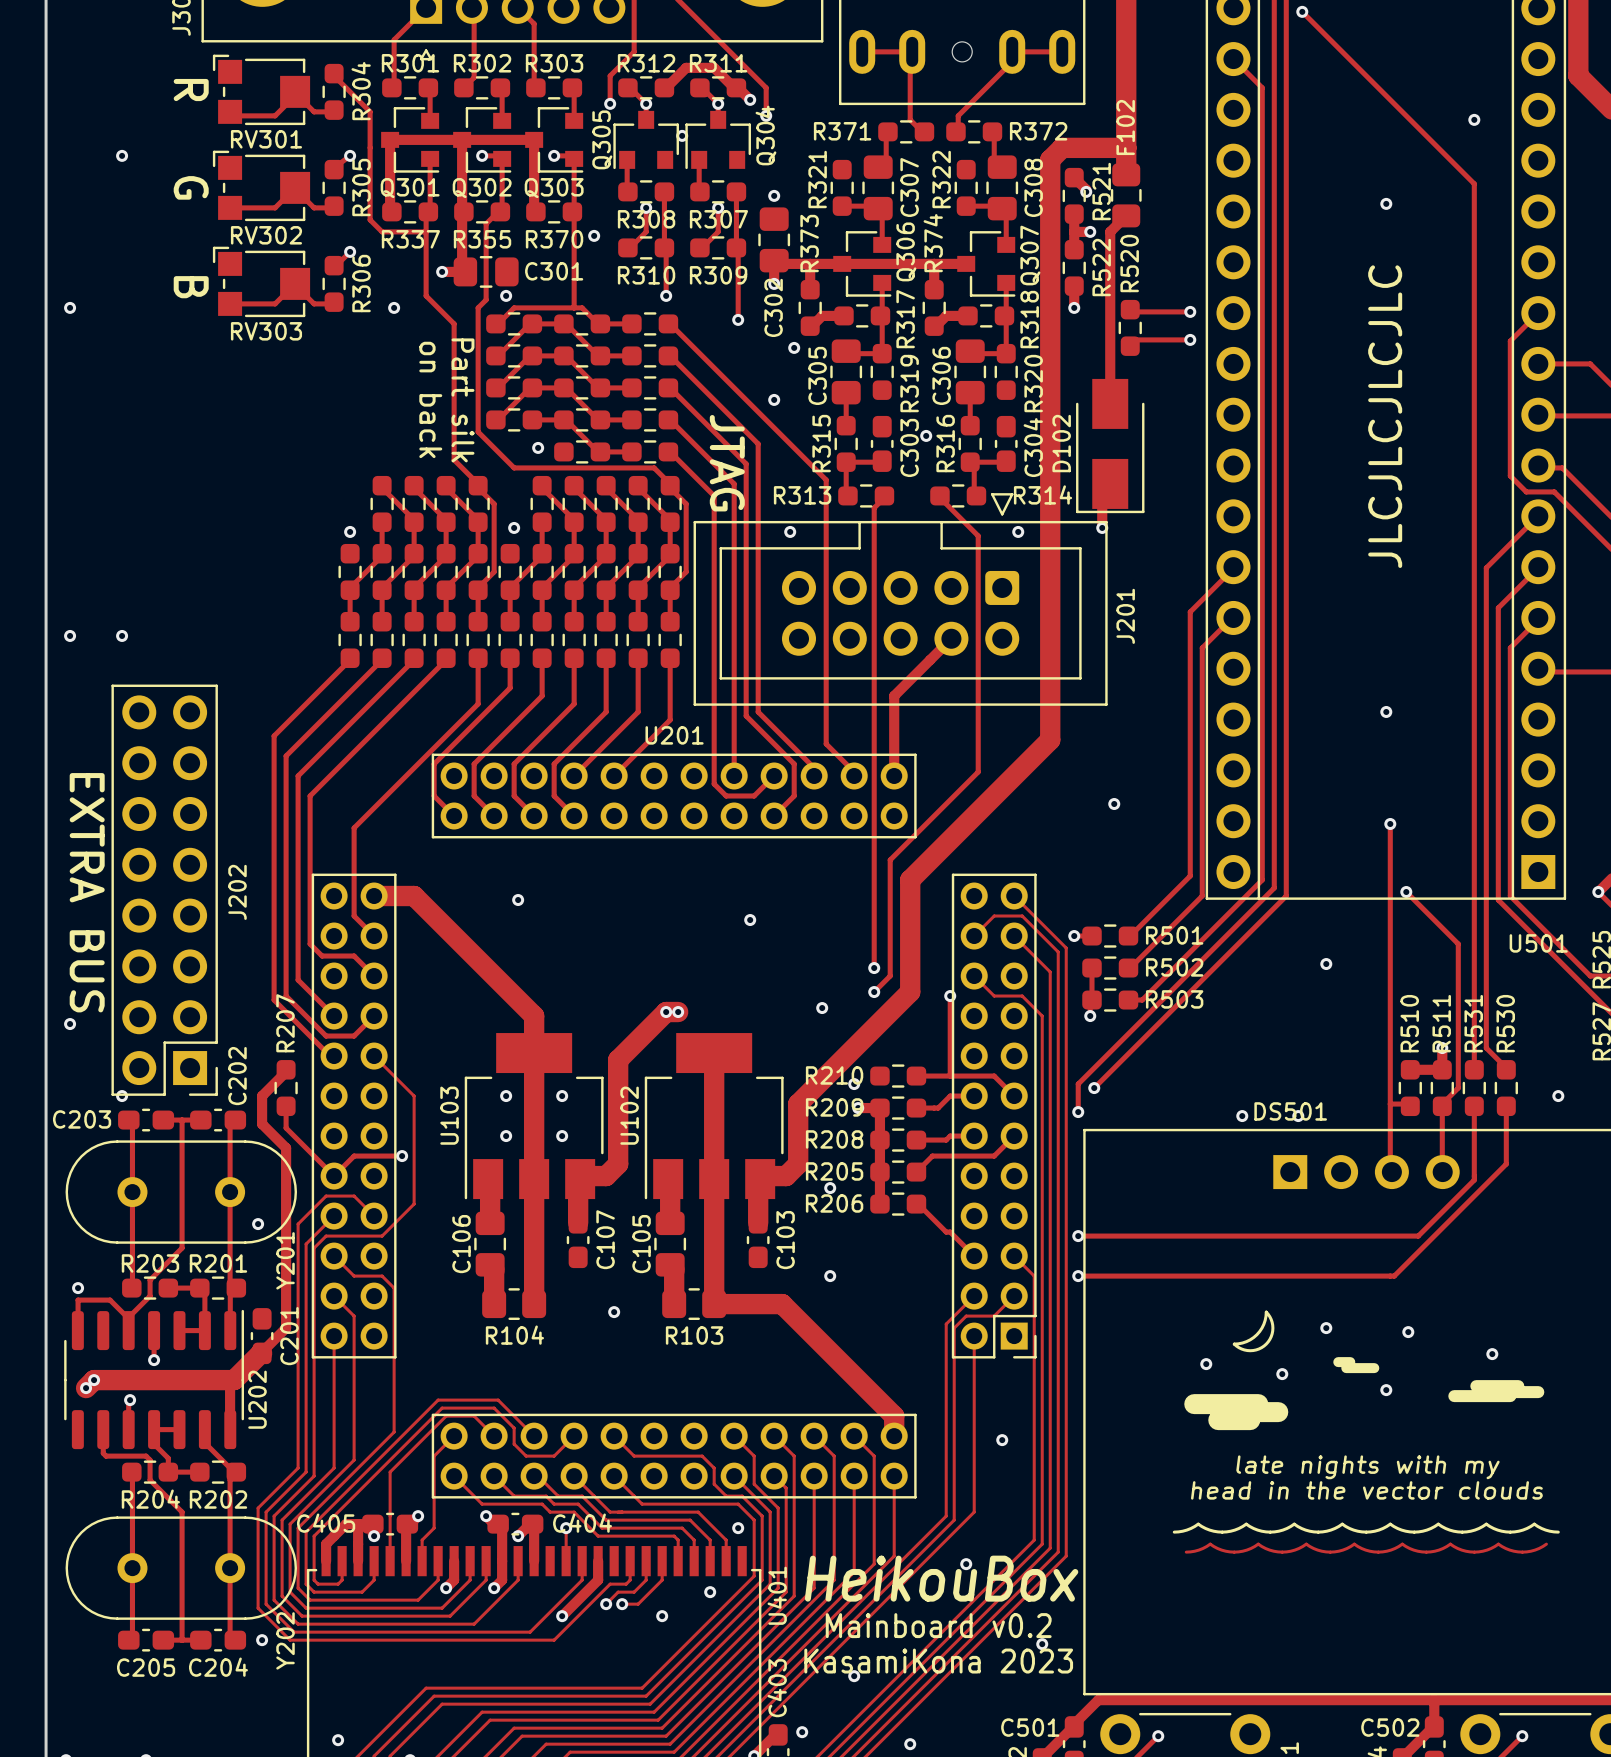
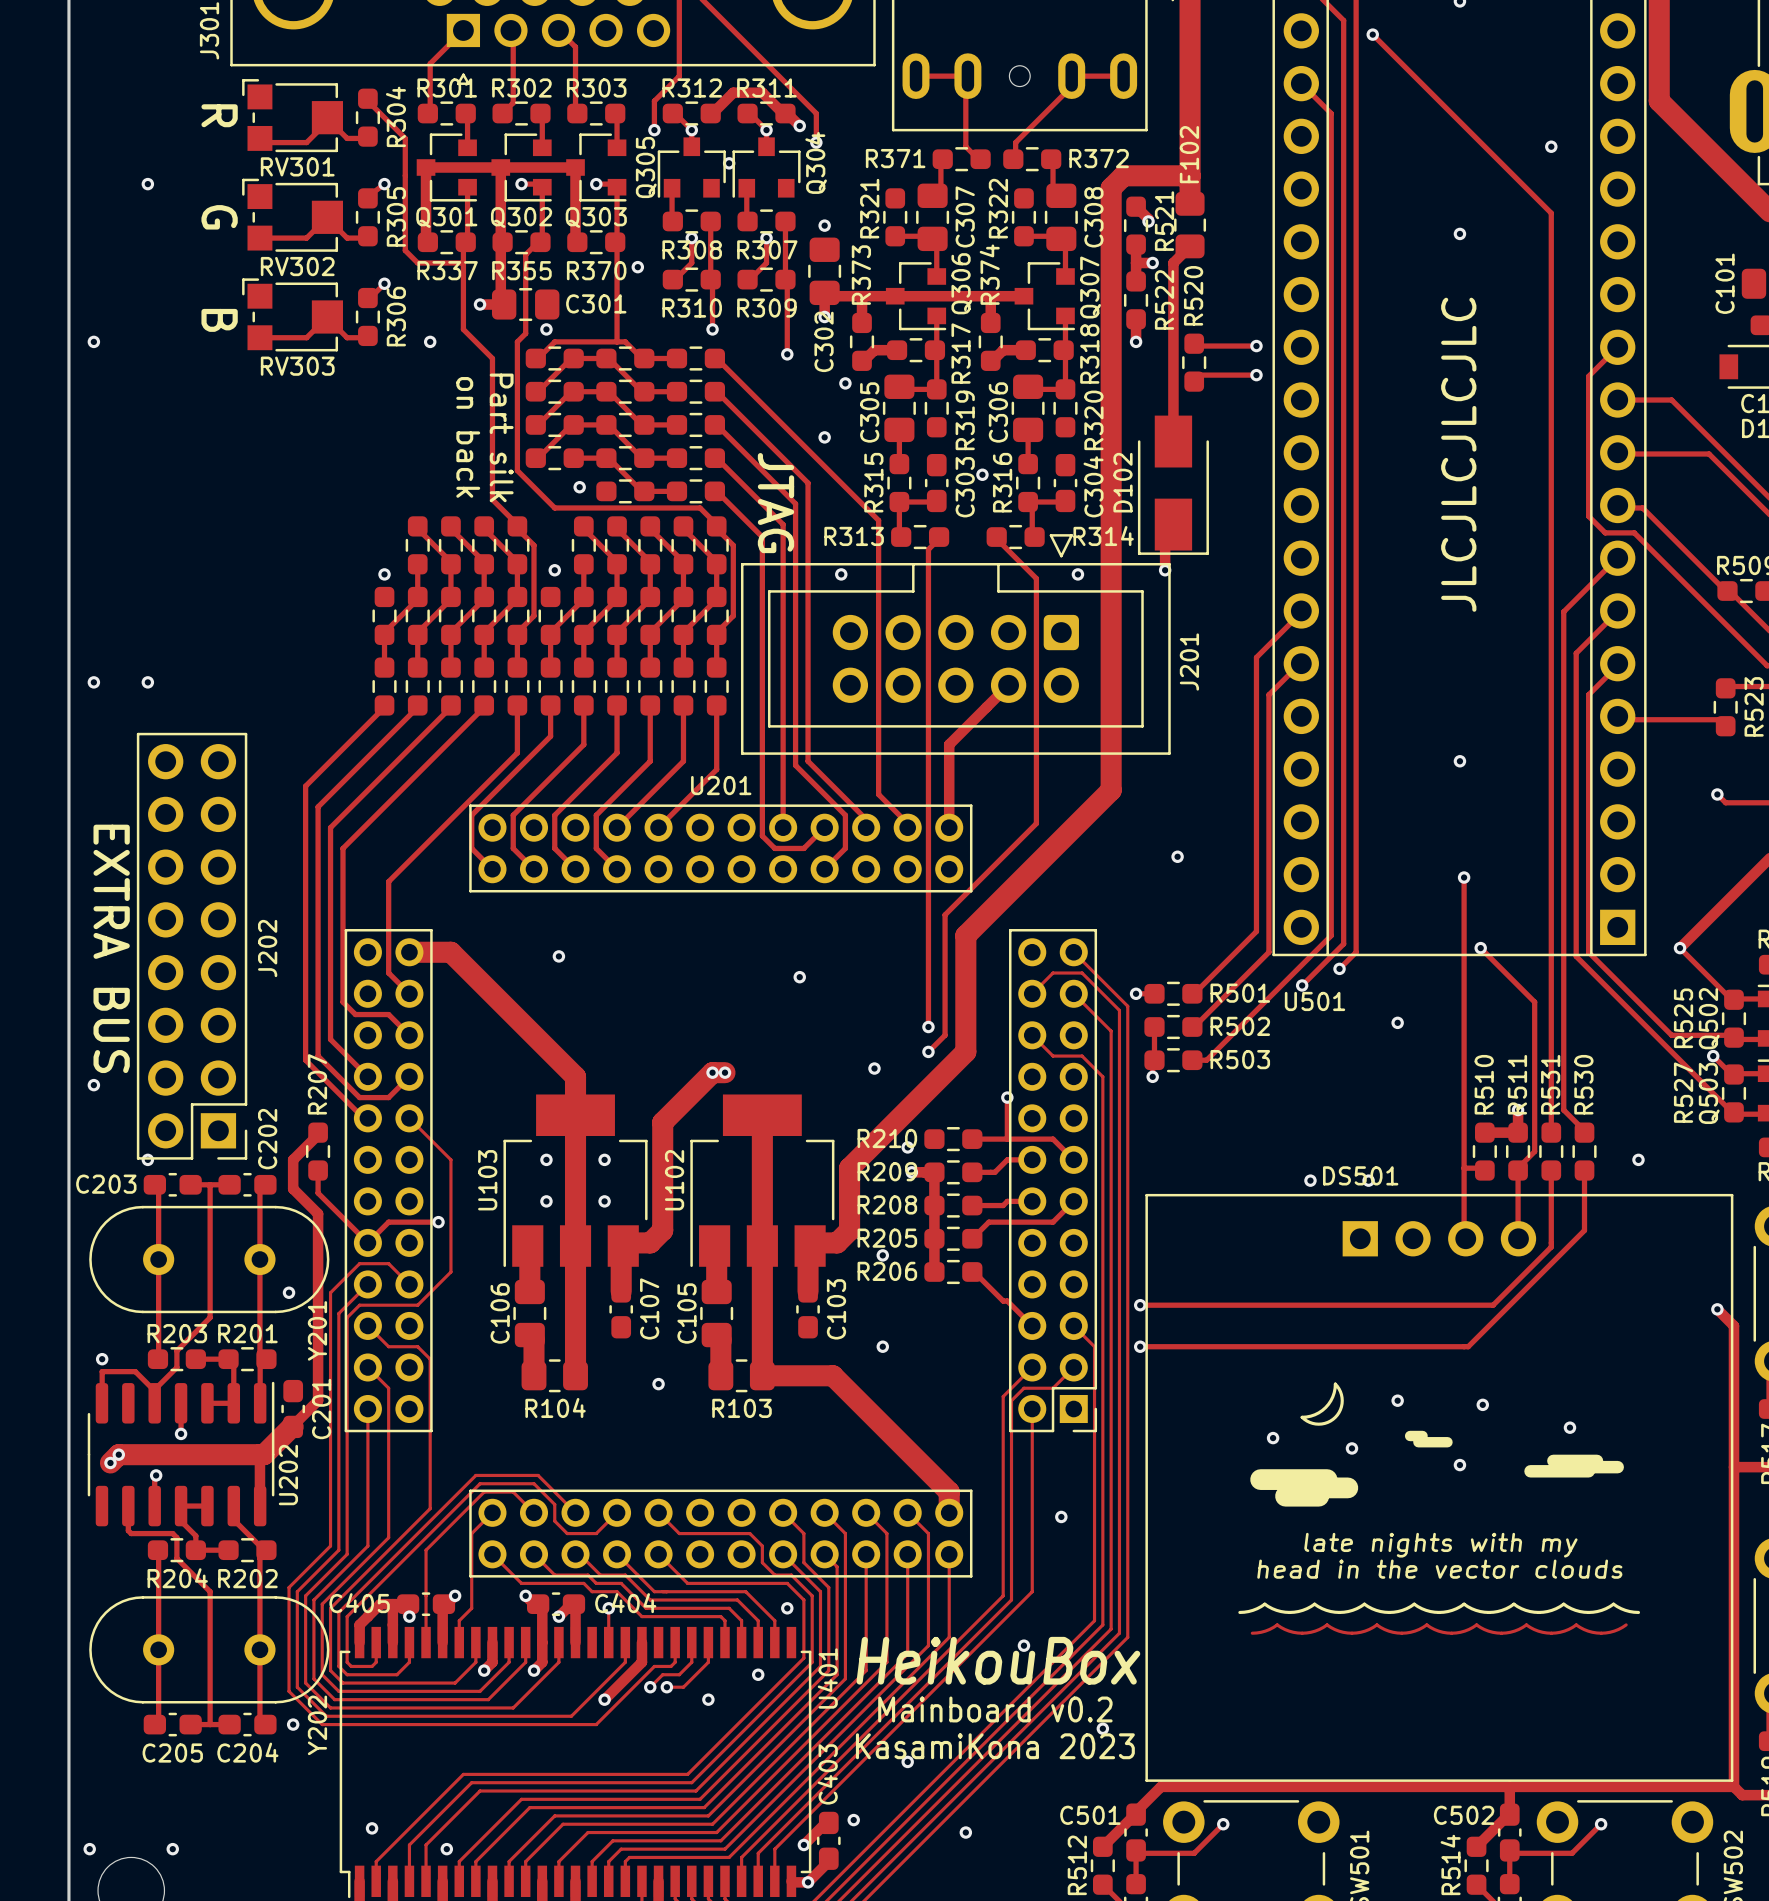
track: (1270, 912) (1094, 1088) -> none
via: none -> (1339, 968)
track: (1234, 928) (1078, 1084) (1078, 1112) -> none
via: none -> (1302, 985)
U501 name position: U501 (1538, 943) -> U501 (1315, 1001)
track: (950, 996) (950, 1036) -> none
via position: (950, 996) -> (1007, 1097)
via: (1094, 1088) -> none
via: (1078, 1112) -> none

